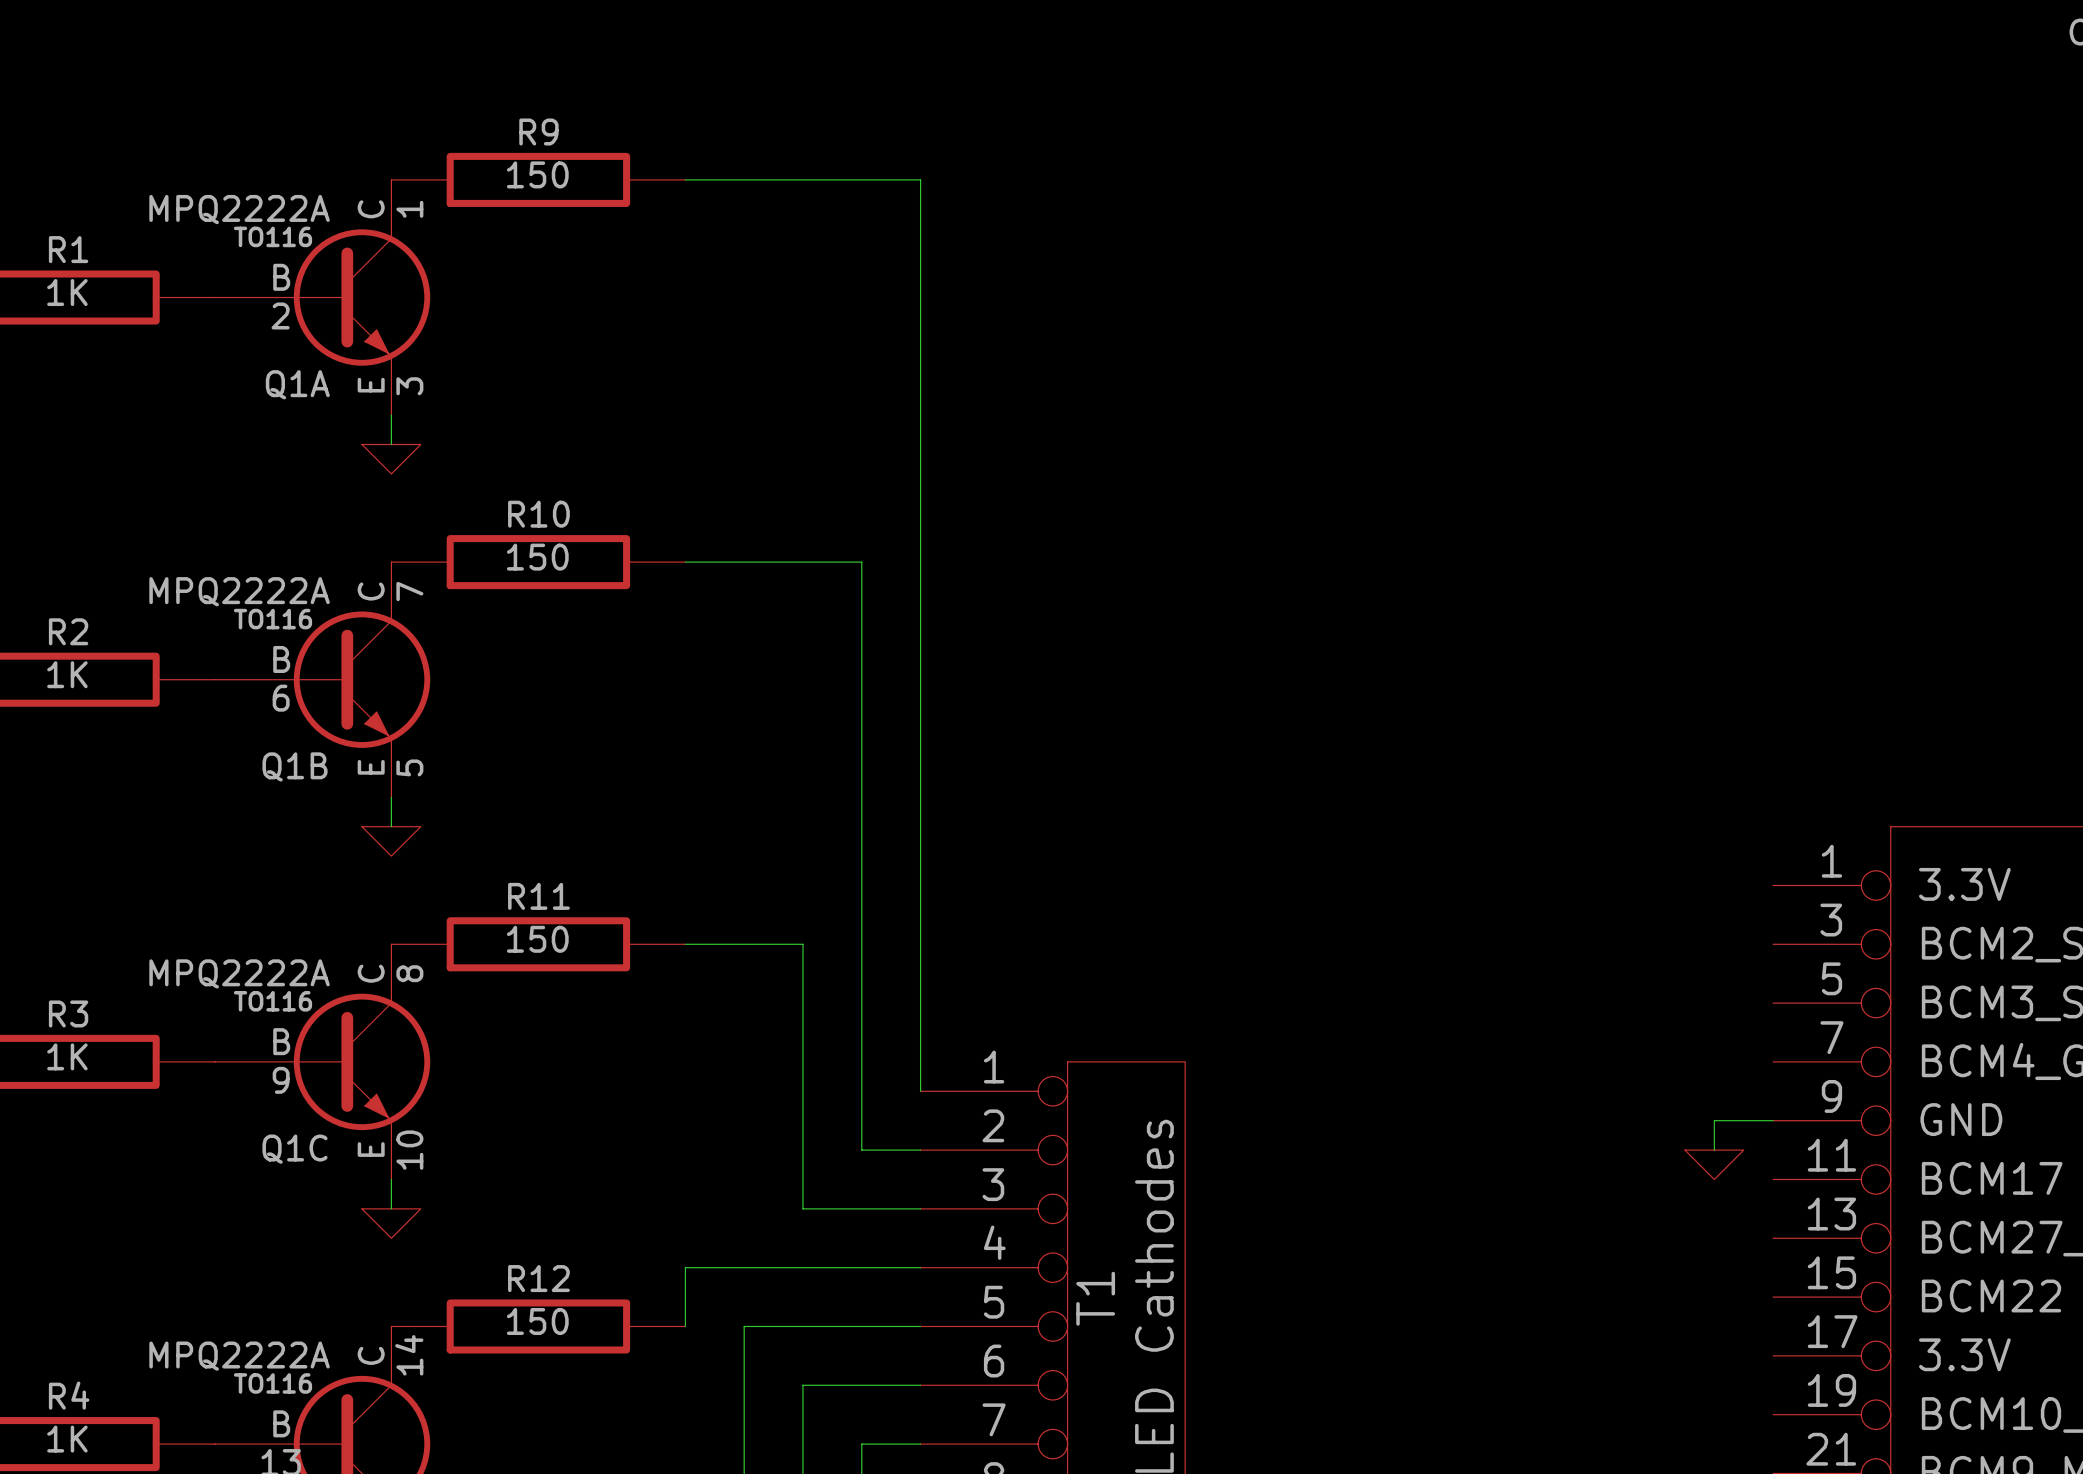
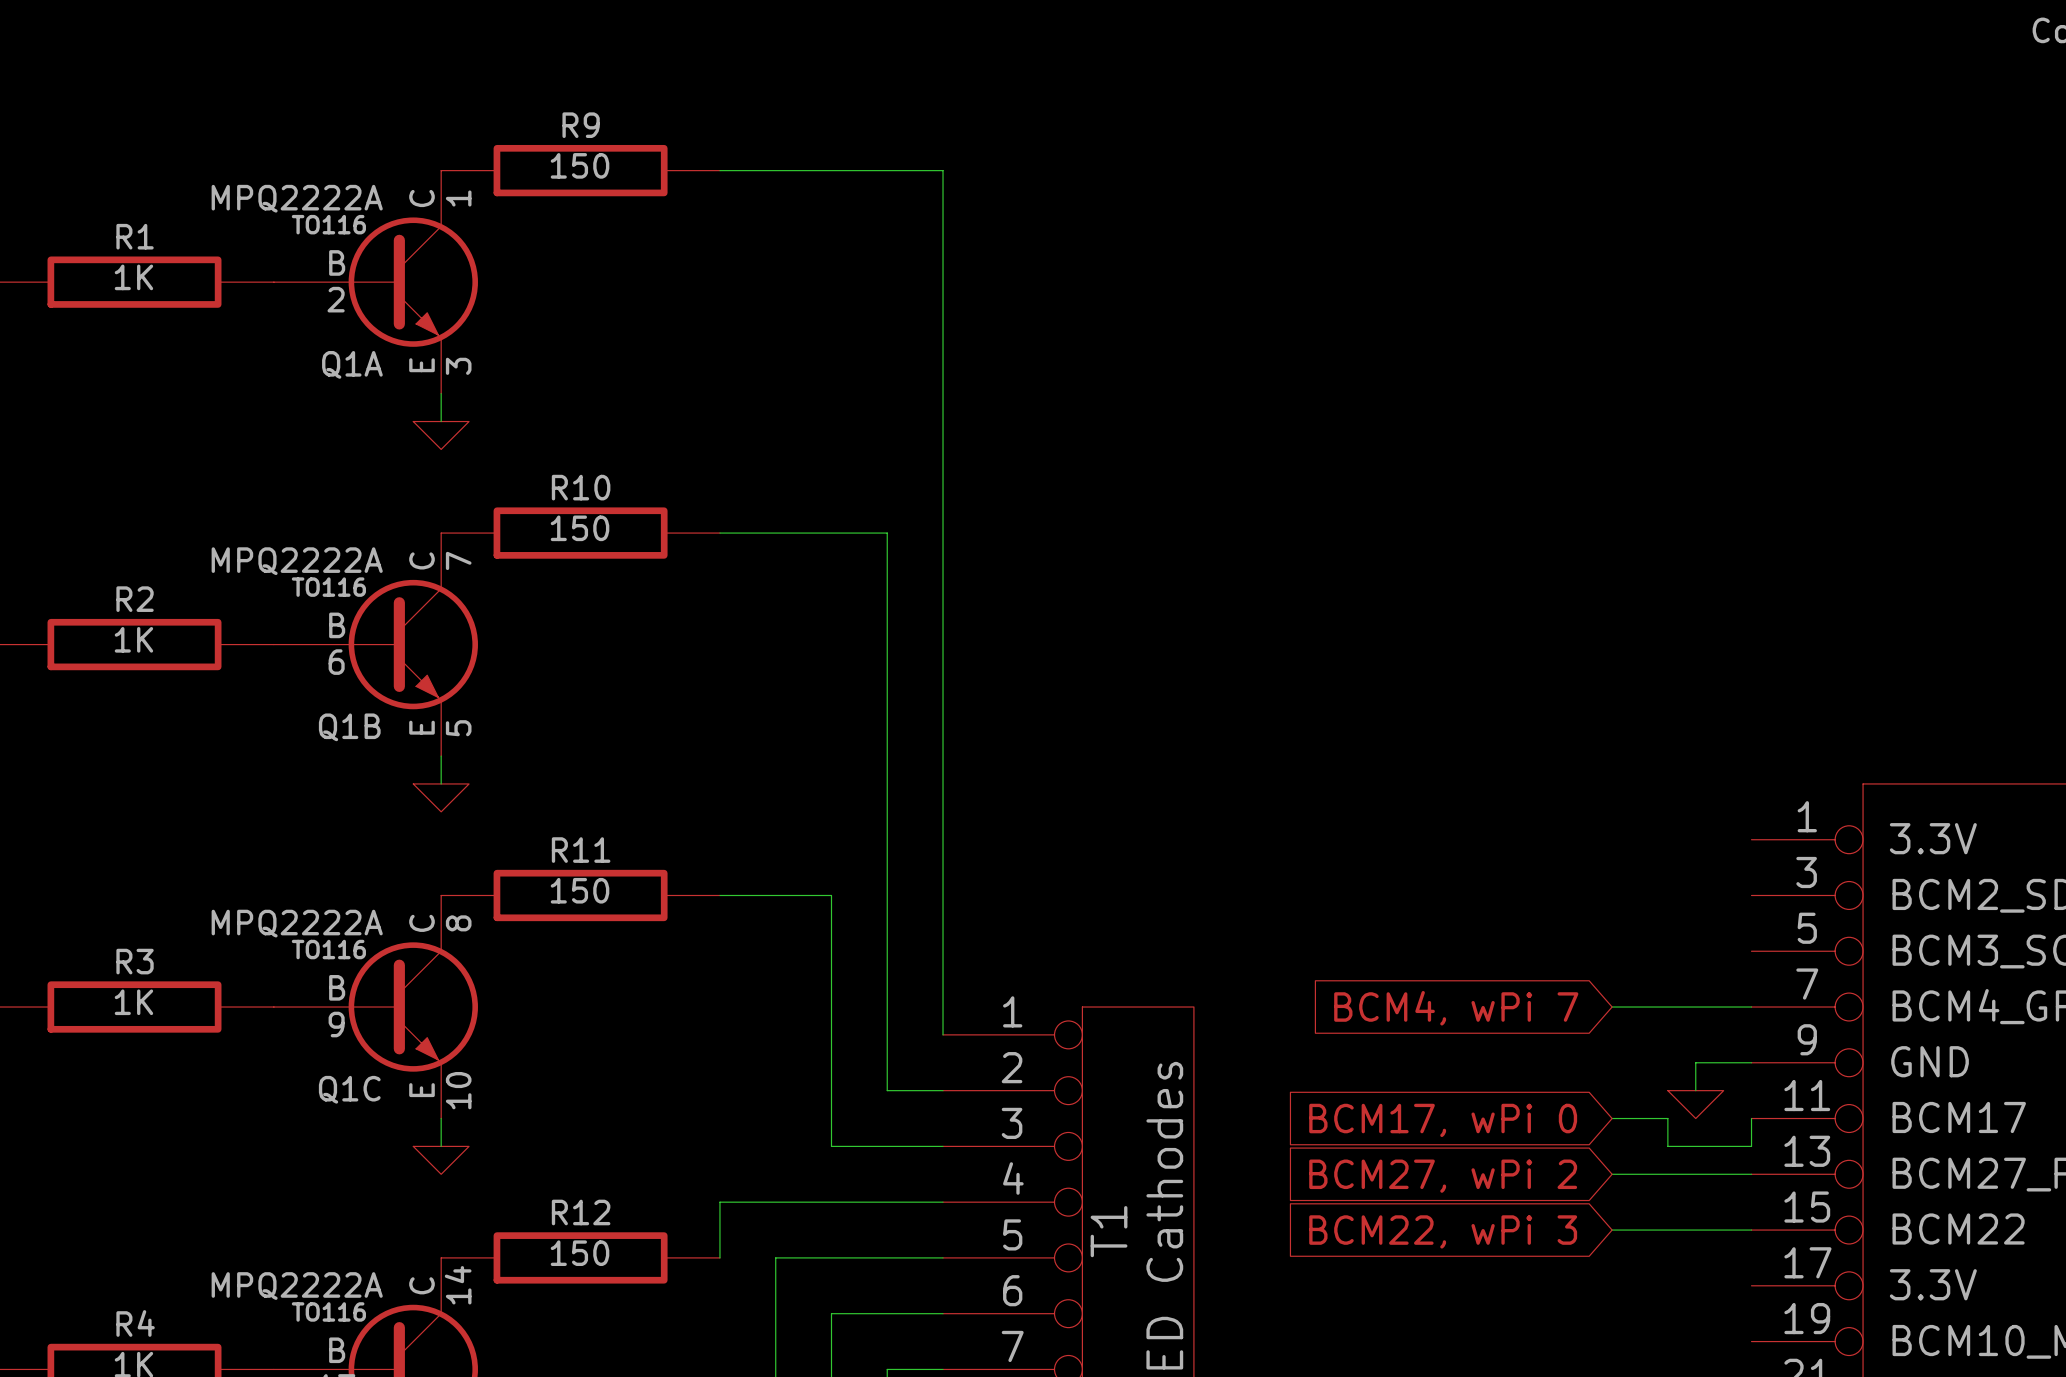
wire: none -> (1612, 1007) (1751, 1007)
global label: none -> BCM4, wPi 7 (1456, 1008)
wire: none -> (1612, 1118) (1667, 1118) (1667, 1146) (1751, 1146) (1751, 1118)
global label: none -> BCM17, wPi 0 (1443, 1120)
wire: none -> (1612, 1174) (1751, 1174)
global label: none -> BCM27, wPi 2 (1443, 1176)
wire: none -> (1612, 1230) (1751, 1230)
global label: none -> BCM22, wPi 3 (1443, 1231)

